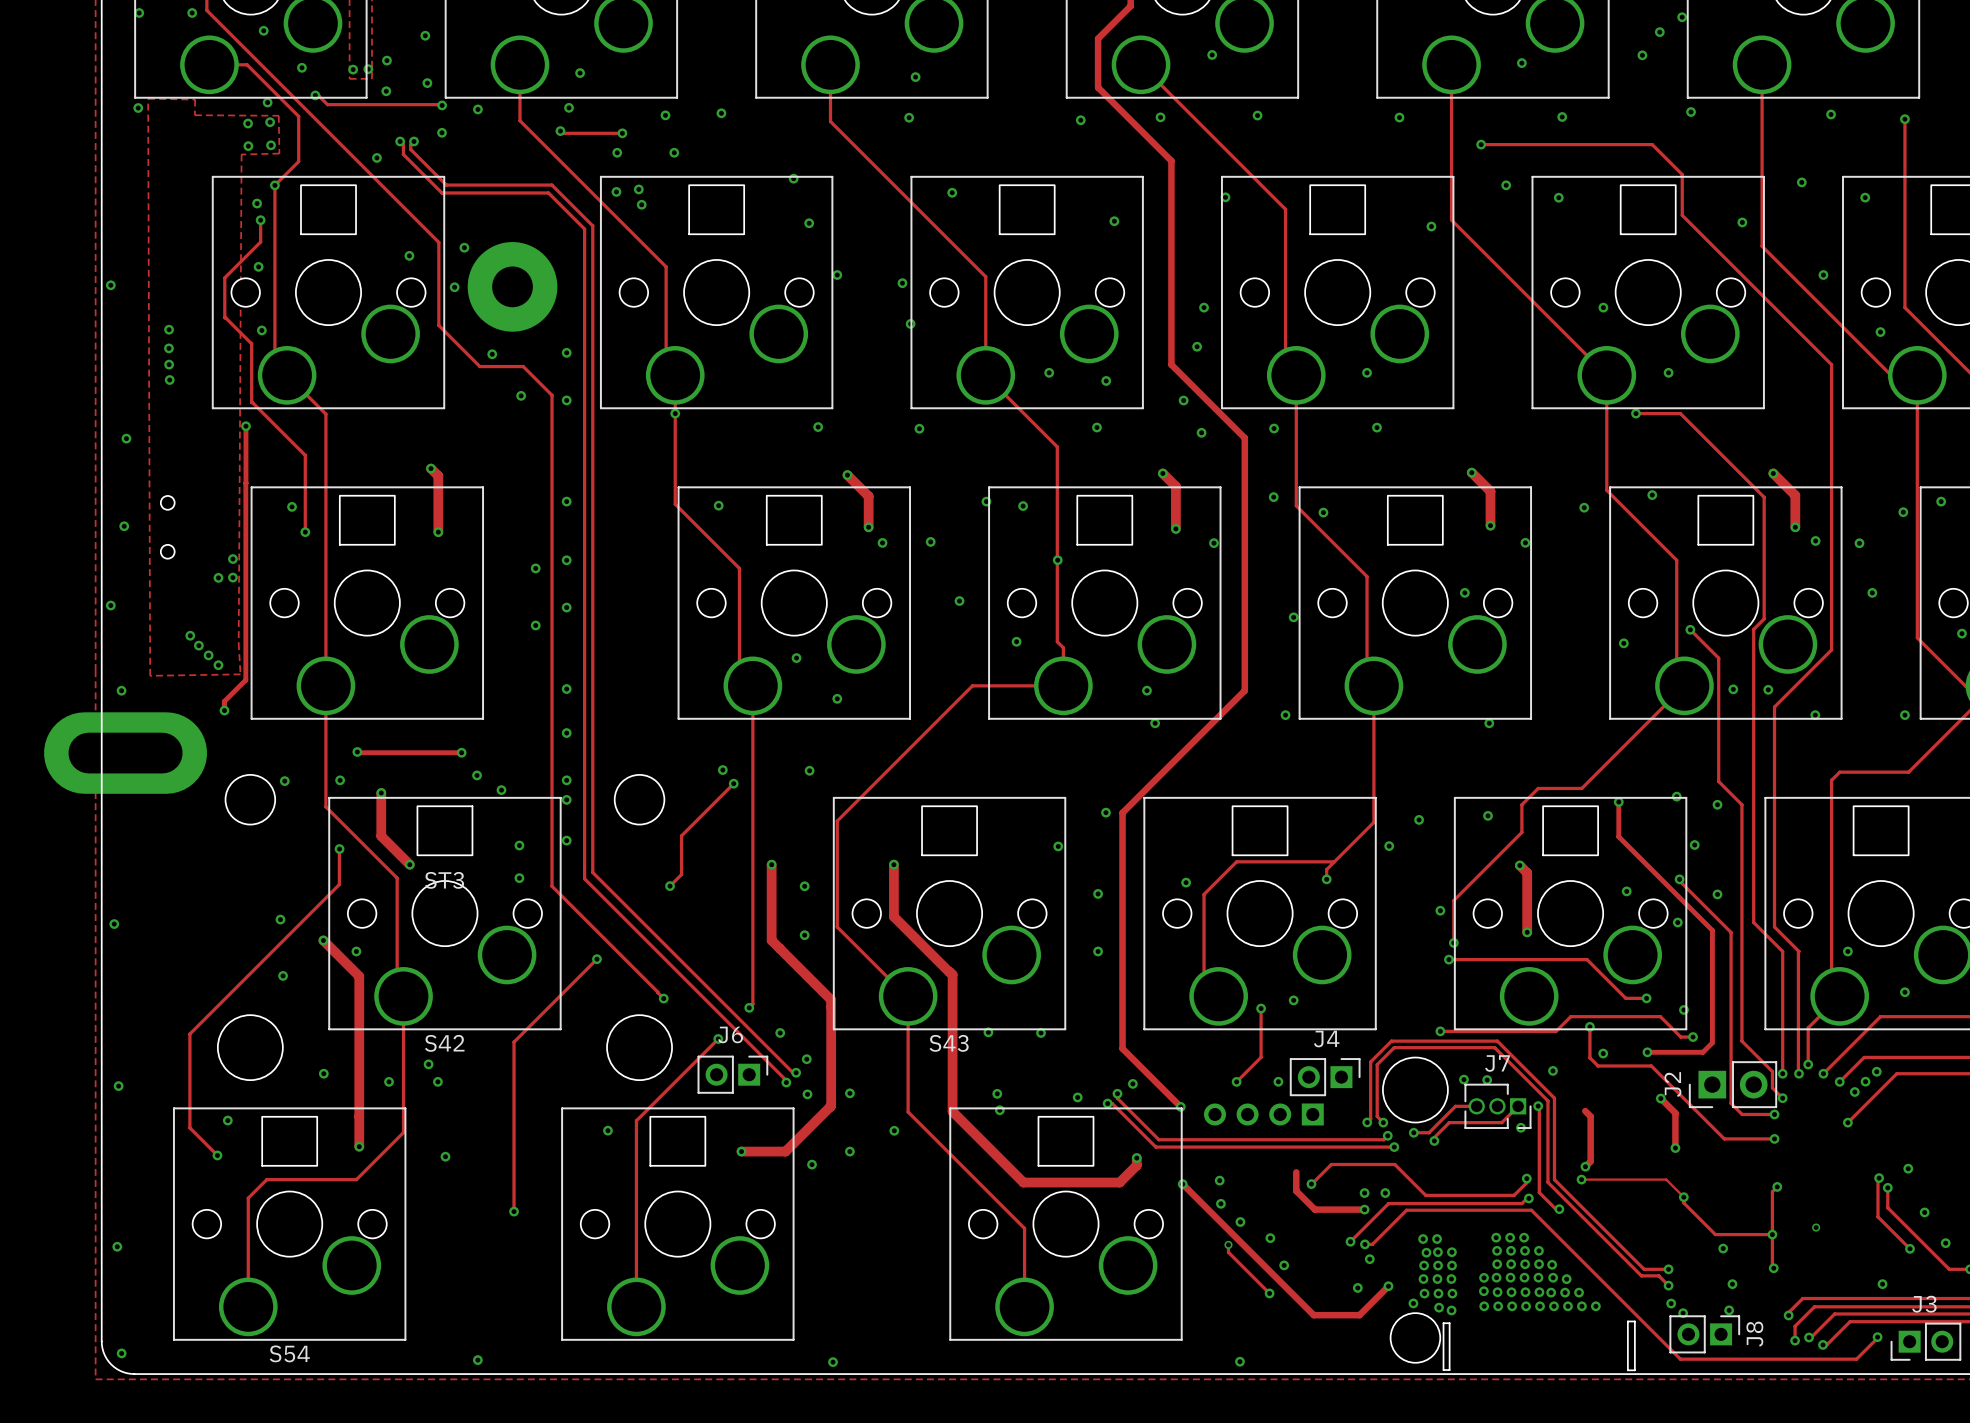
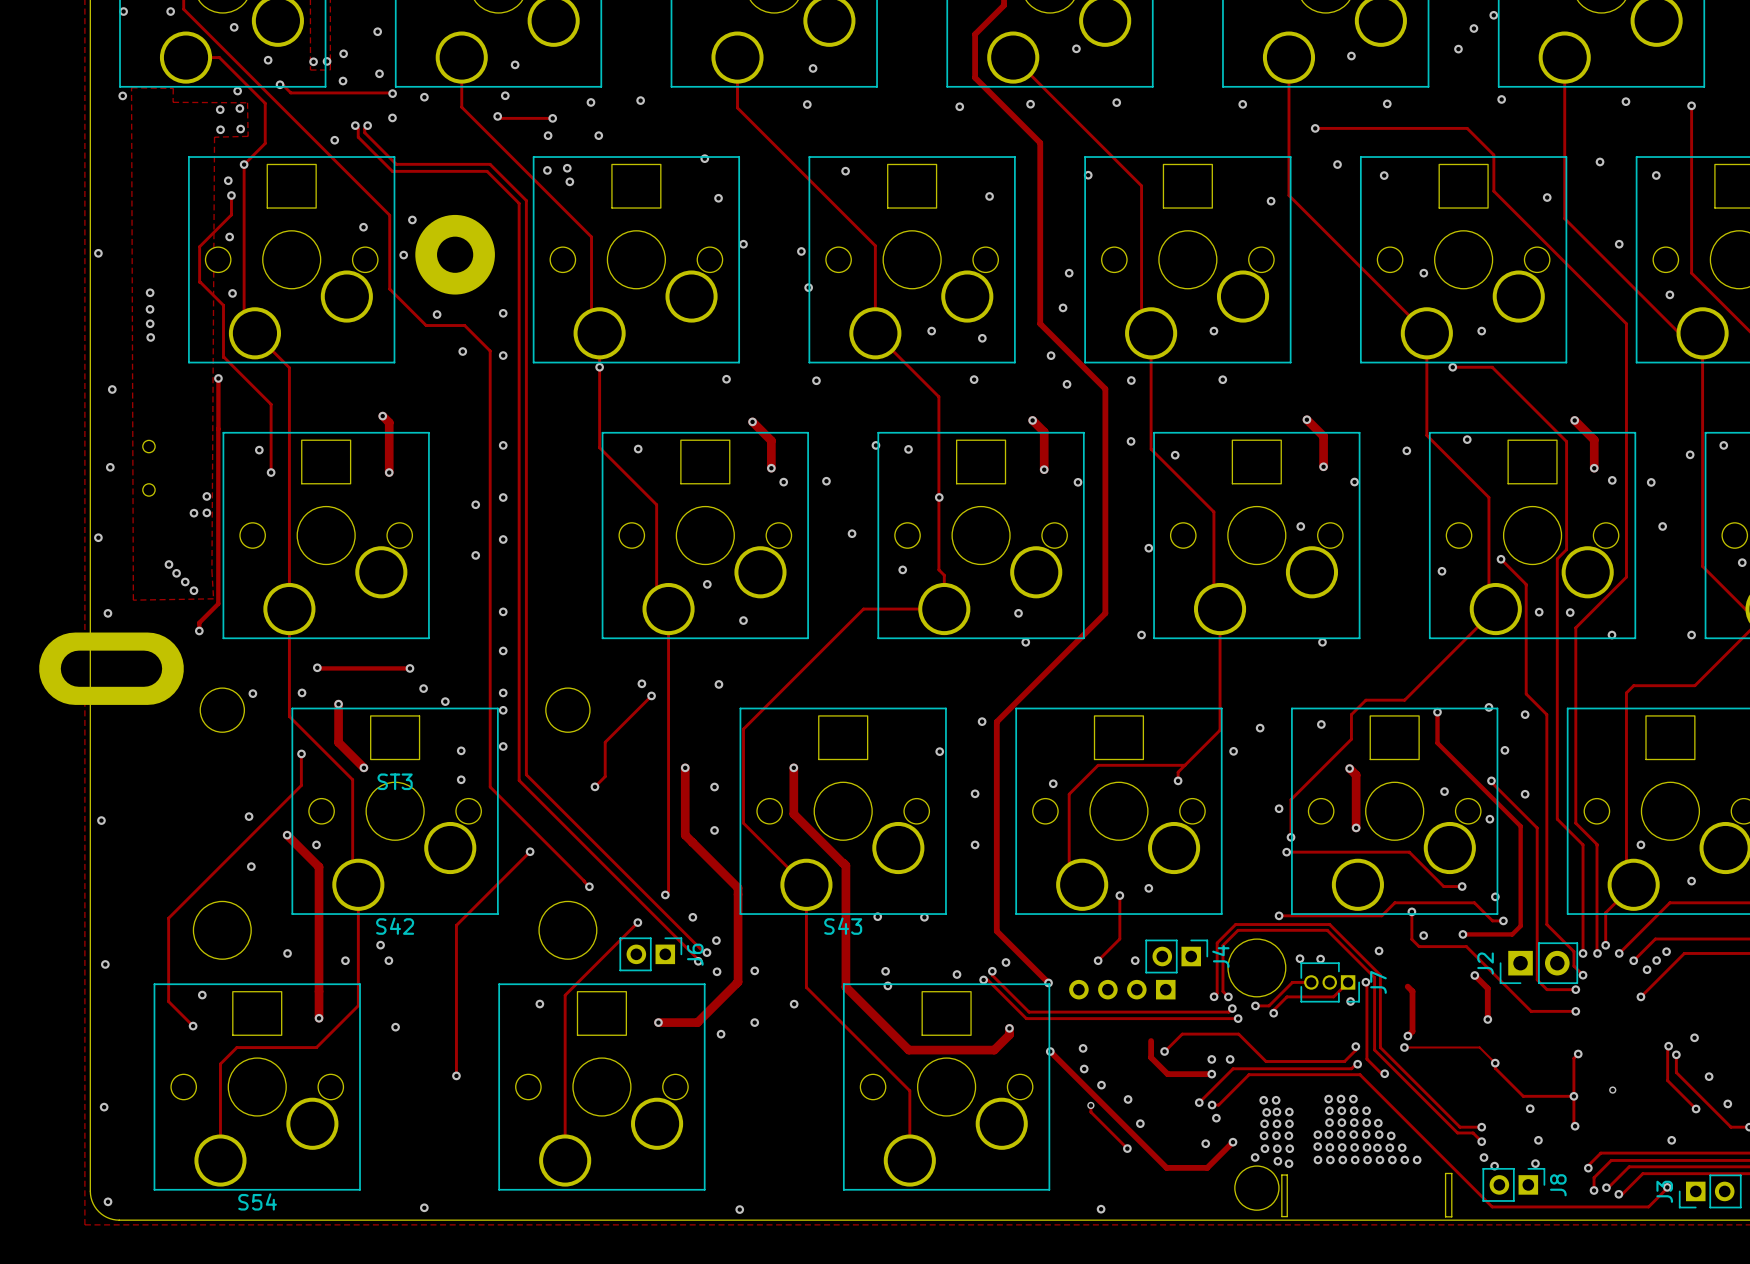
J6 name rotation: 0° (730, 1034) -> 90° counterclockwise (695, 954)
J6 name position: J6 (730, 1034) -> J6 (695, 954)
J4 name rotation: 0° (1326, 1039) -> 90° counterclockwise (1220, 956)
J4 name position: J4 (1326, 1039) -> J4 (1220, 956)
J7 name rotation: 0° (1497, 1063) -> 90° counterclockwise (1378, 982)
J7 name position: J7 (1497, 1063) -> J7 (1378, 982)
J3 name rotation: 0° (1924, 1304) -> 90° counterclockwise (1664, 1191)
J3 name position: J3 (1924, 1304) -> J3 (1664, 1191)

